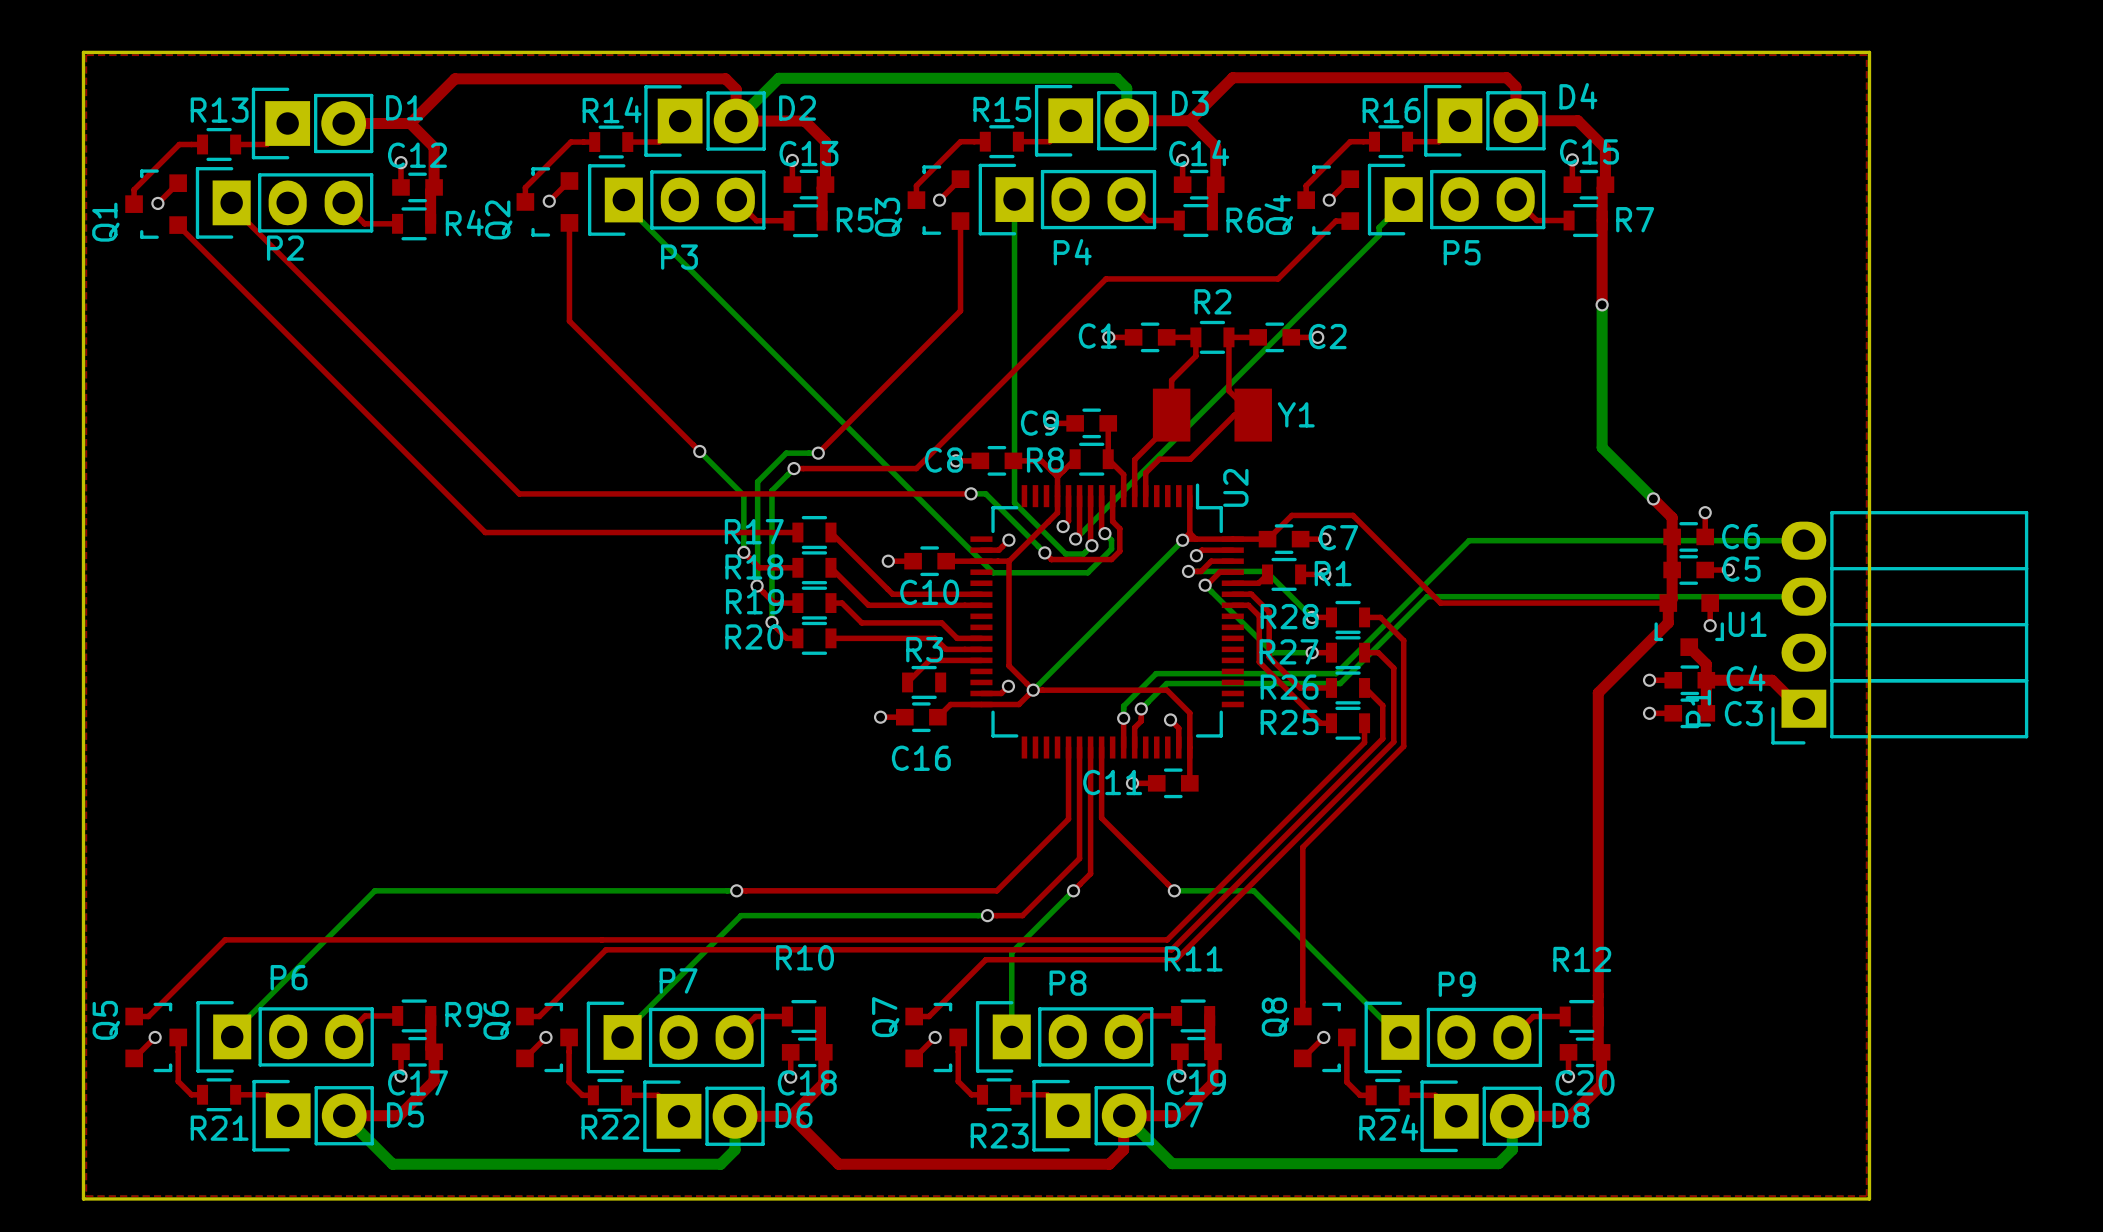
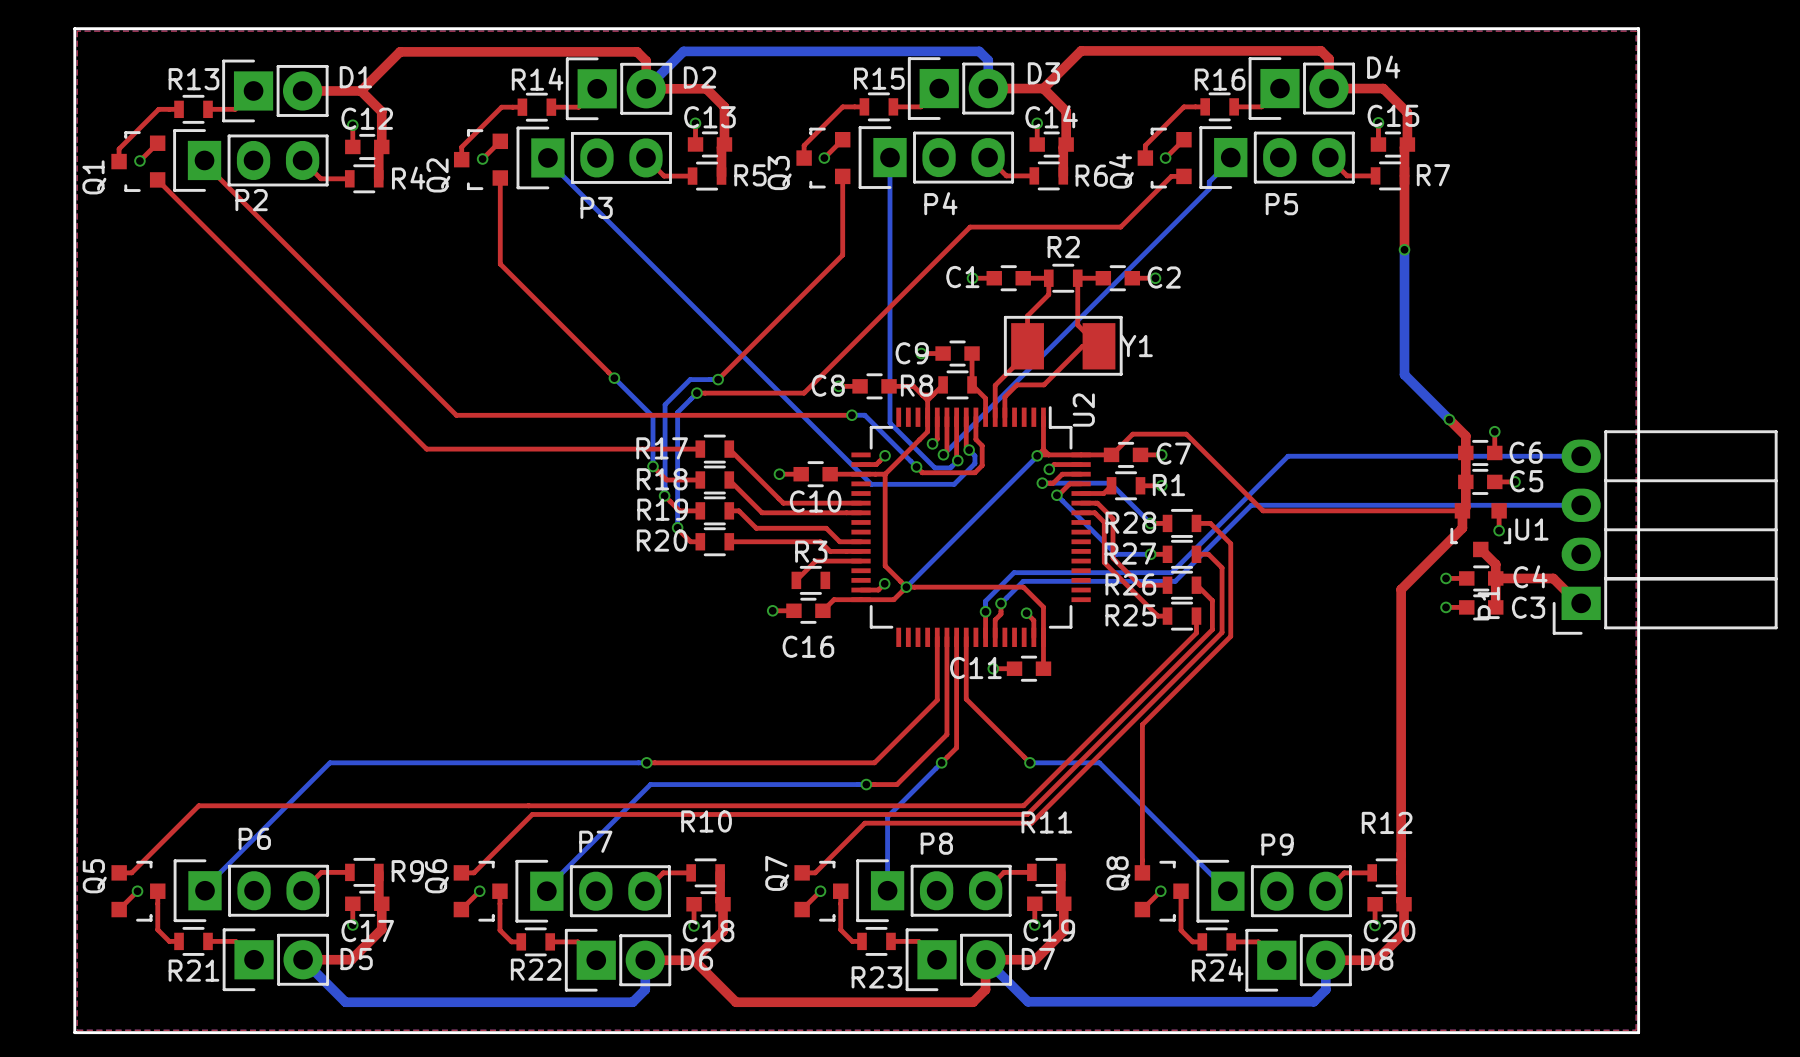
Y1 footprint: [1152, 388, 1272, 442] -> [1003, 315, 1123, 376]

